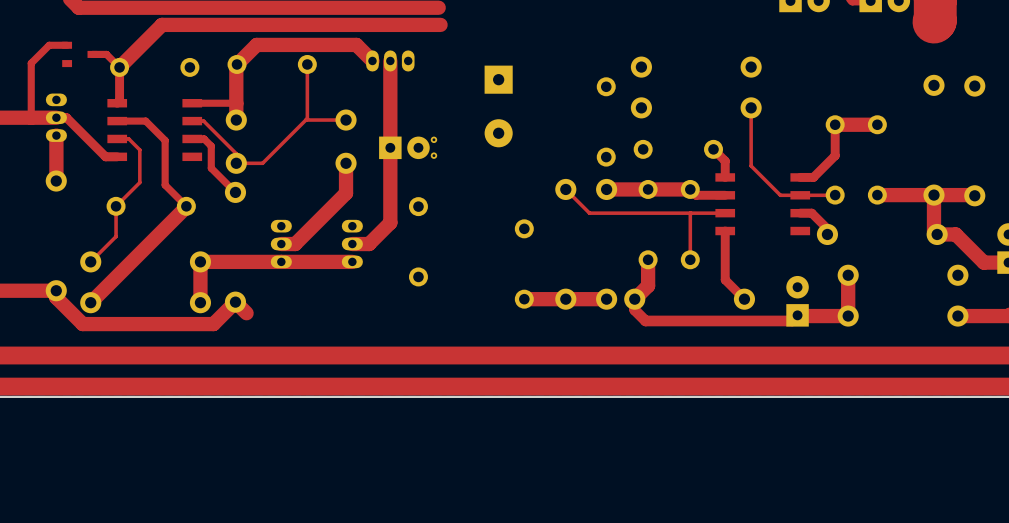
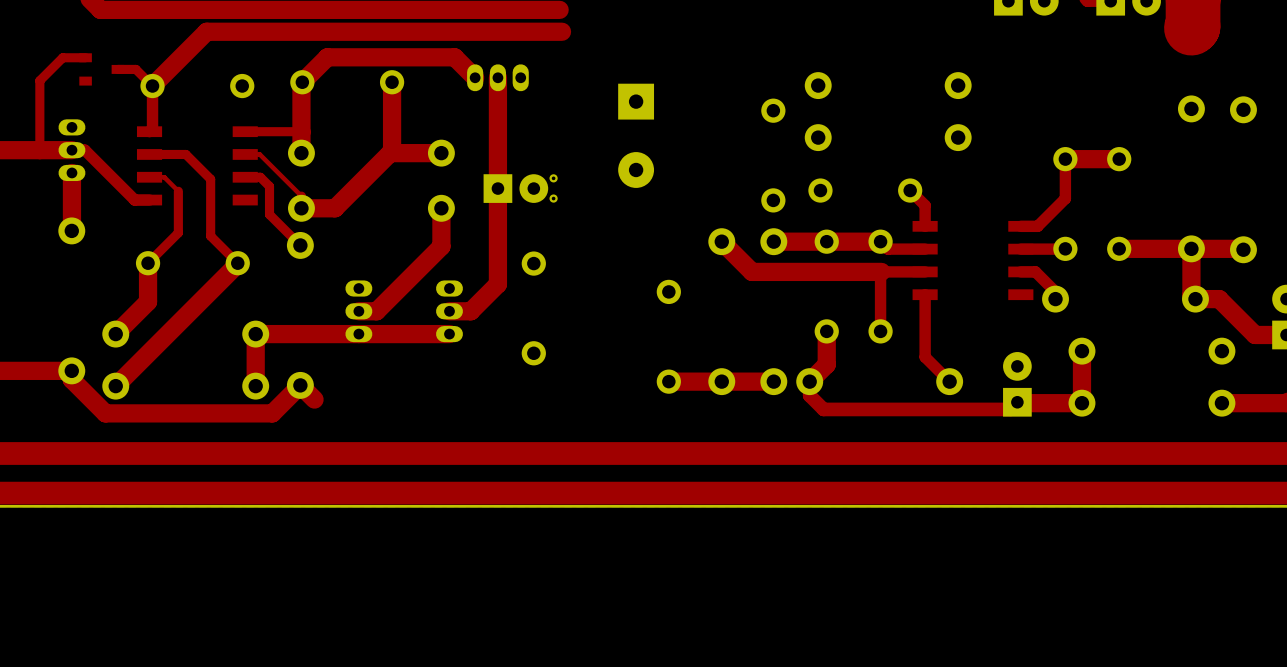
top track width: thin (307, 64) (307, 118) (262, 163) (236, 163) (236, 153) -> thick (392, 82) (392, 151) (335, 208) (301, 208) (301, 196)
top track: (751, 107) (751, 165) (780, 195) (800, 195) -> none
top track width: thin (346, 120) (305, 120) -> thick (441, 153) (390, 153)
top track width: thin (139, 149) (139, 182) (116, 206) (116, 236) (90, 261) -> thick (178, 191) (178, 232) (148, 263) (148, 301) (115, 334)
top track width: thin (565, 189) (589, 213) (725, 213) -> thick (721, 241) (752, 271) (925, 271)
top track width: thin (834, 195) (800, 195) -> thick (1065, 249) (1020, 249)
top track width: thin (691, 213) (690, 259) -> thick (881, 272) (880, 331)

